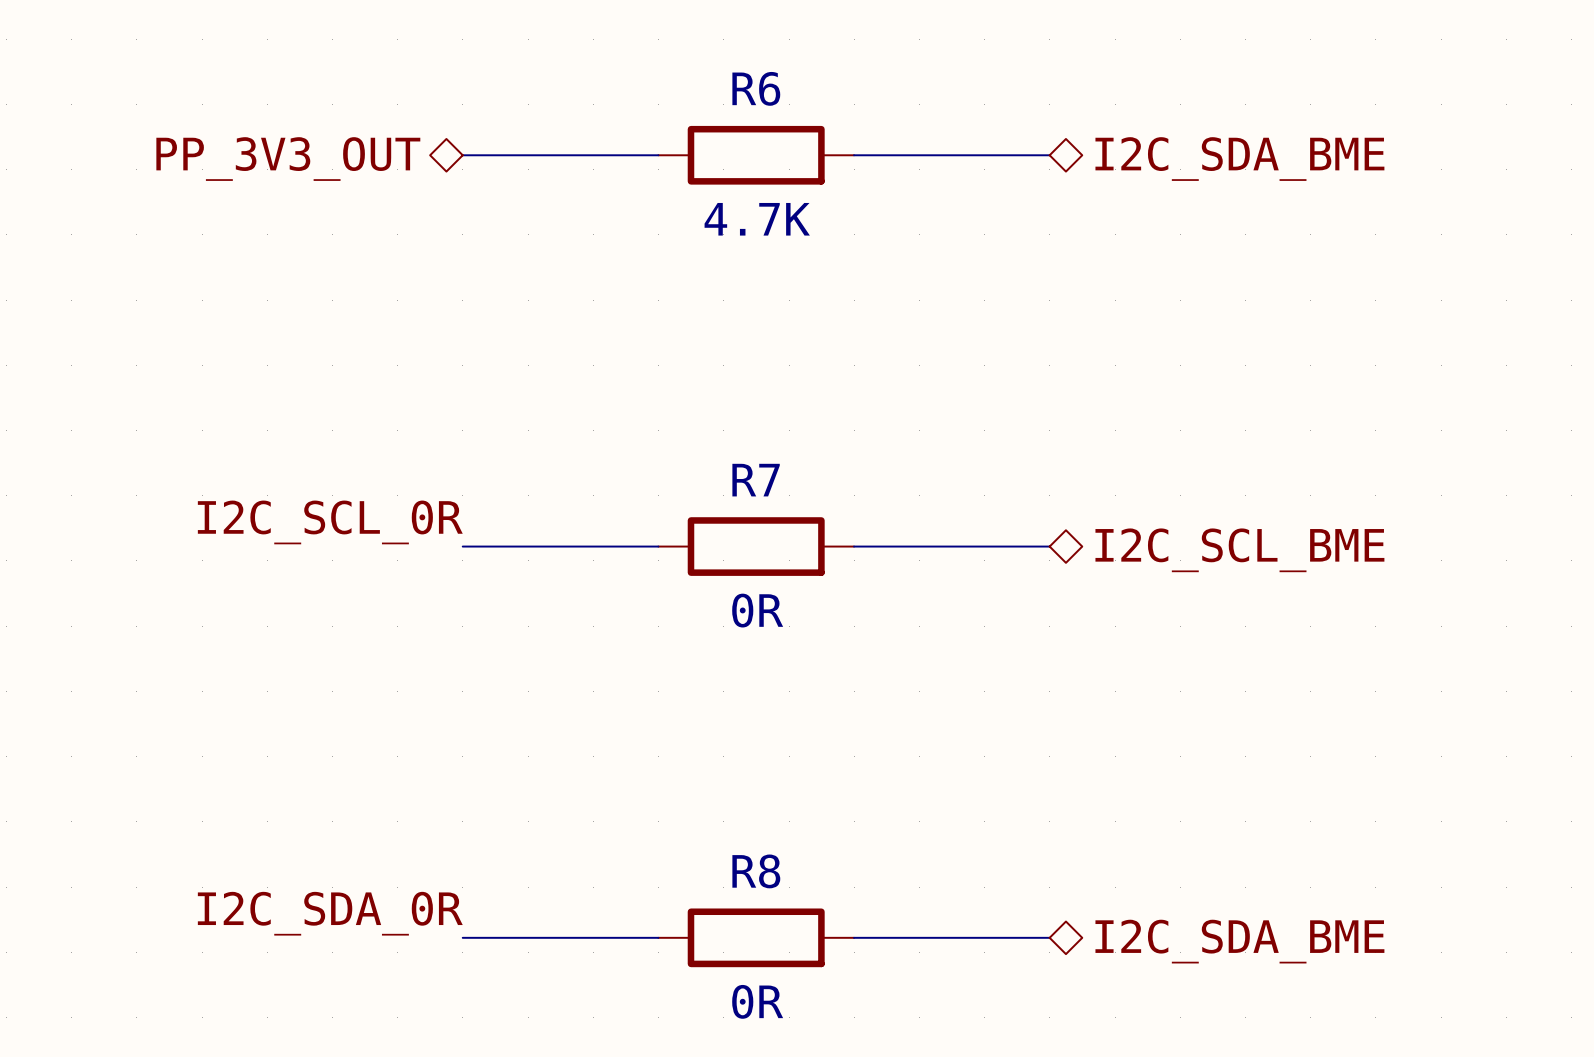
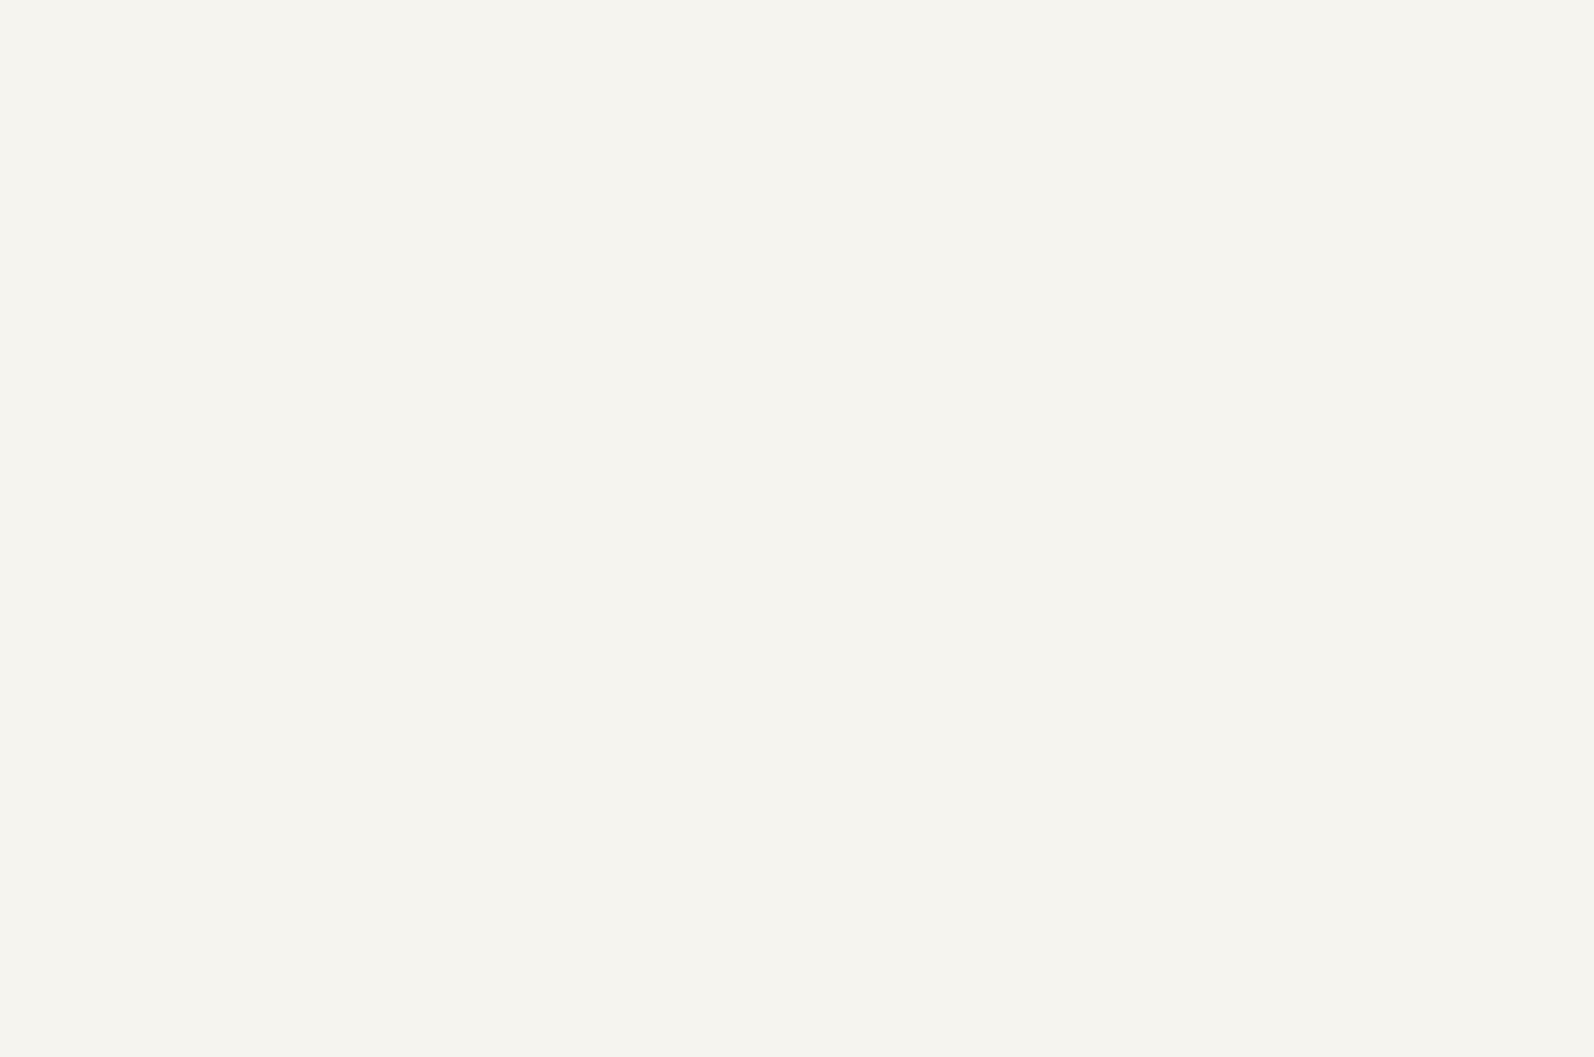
wire: (462, 155) (658, 155) -> none
R6: 4.7K (756, 155) -> none
wire: (854, 155) (1049, 155) -> none
hierarchical label: PP_3V3_OUT (288, 159) -> none
hierarchical label: I2C_SDA_BME (1239, 159) -> none
label: I2C_SCL_0R (330, 522) -> none
wire: (462, 546) (658, 546) -> none
R7: 0R (756, 546) -> none
wire: (854, 546) (1049, 546) -> none
hierarchical label: I2C_SCL_BME (1239, 550) -> none
label: I2C_SDA_0R (330, 913) -> none
wire: (462, 937) (658, 937) -> none
R8: 0R (756, 937) -> none
wire: (854, 937) (1049, 937) -> none
hierarchical label: I2C_SDA_BME (1239, 941) -> none

